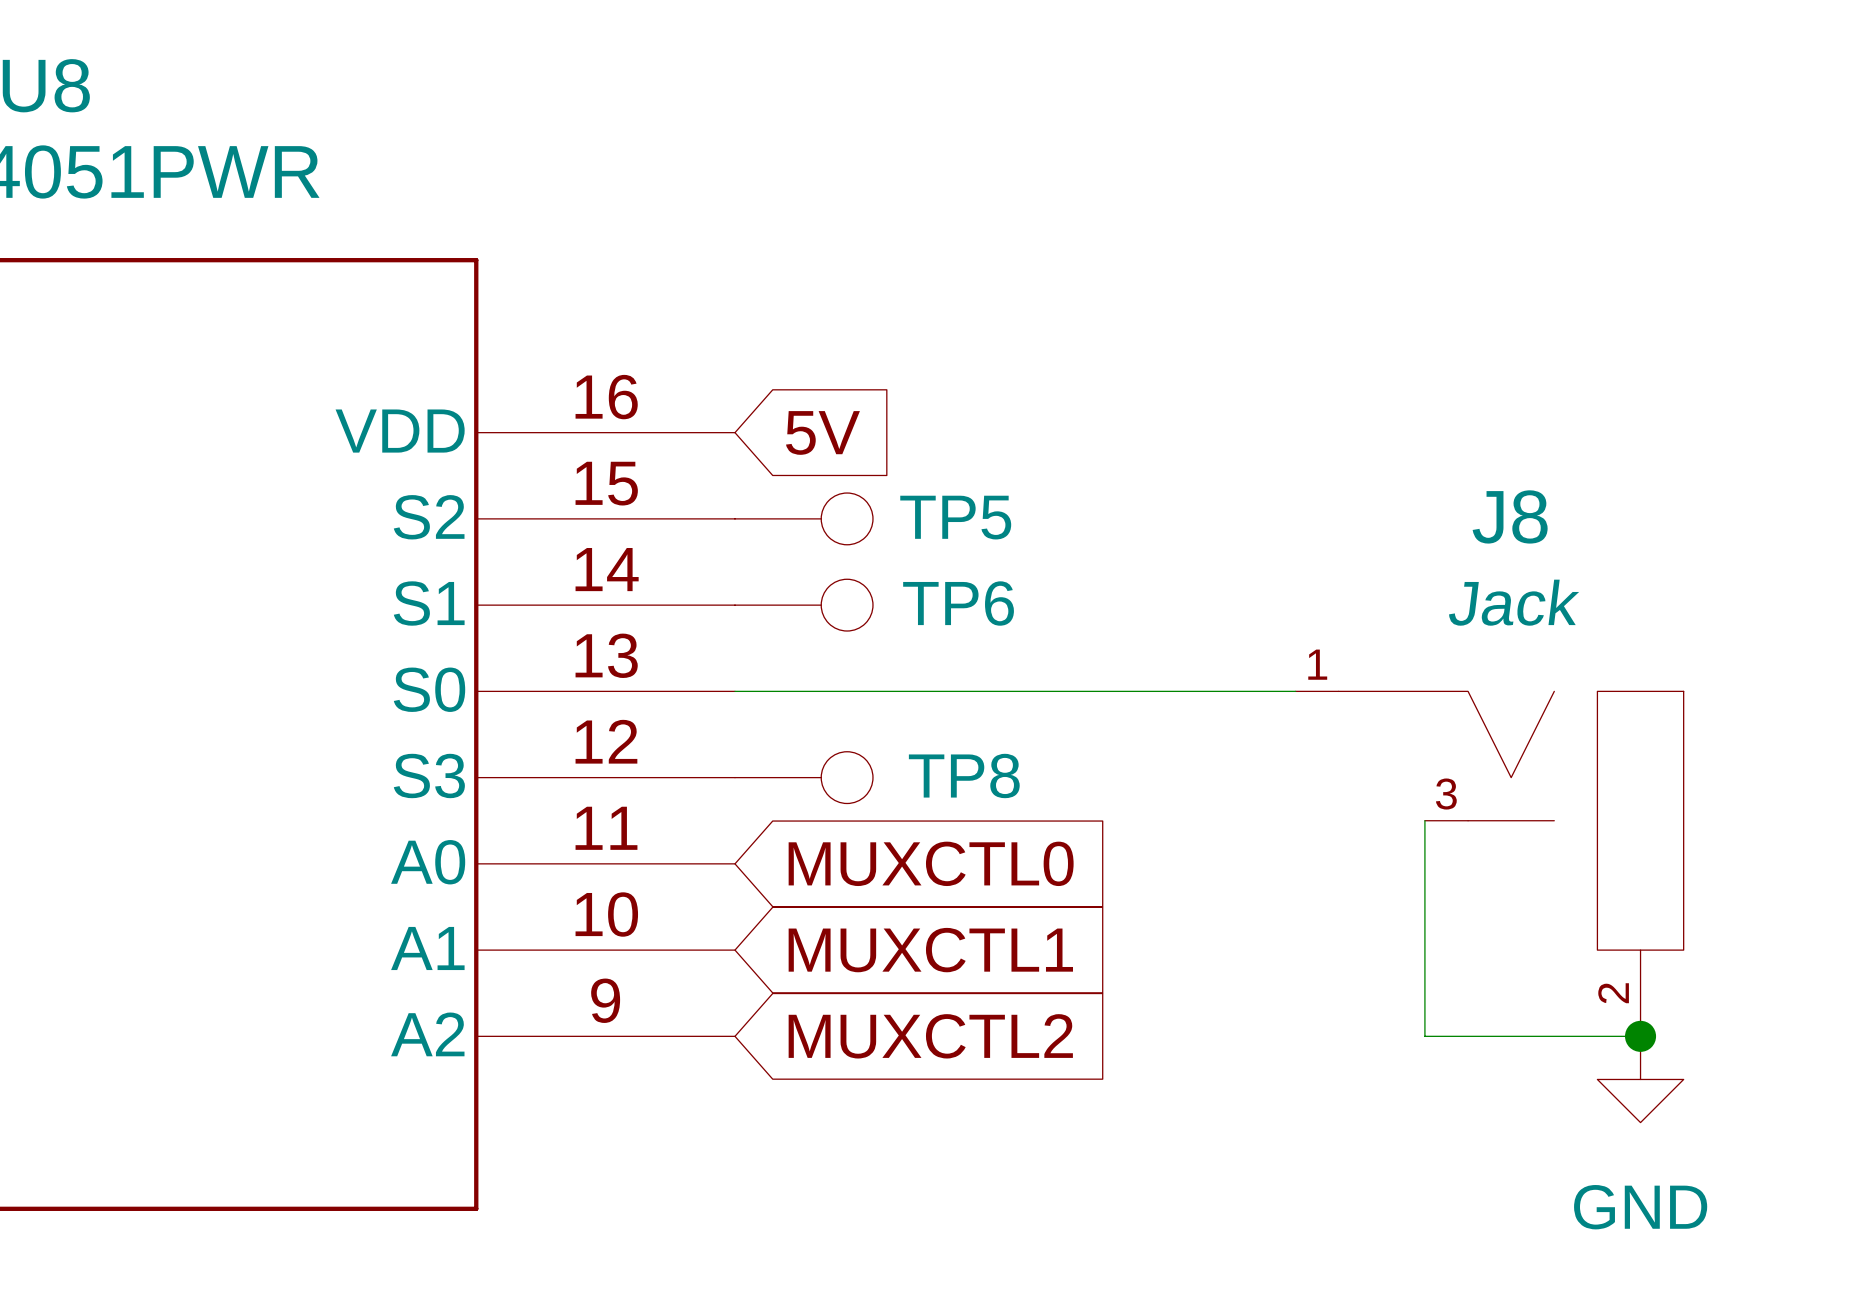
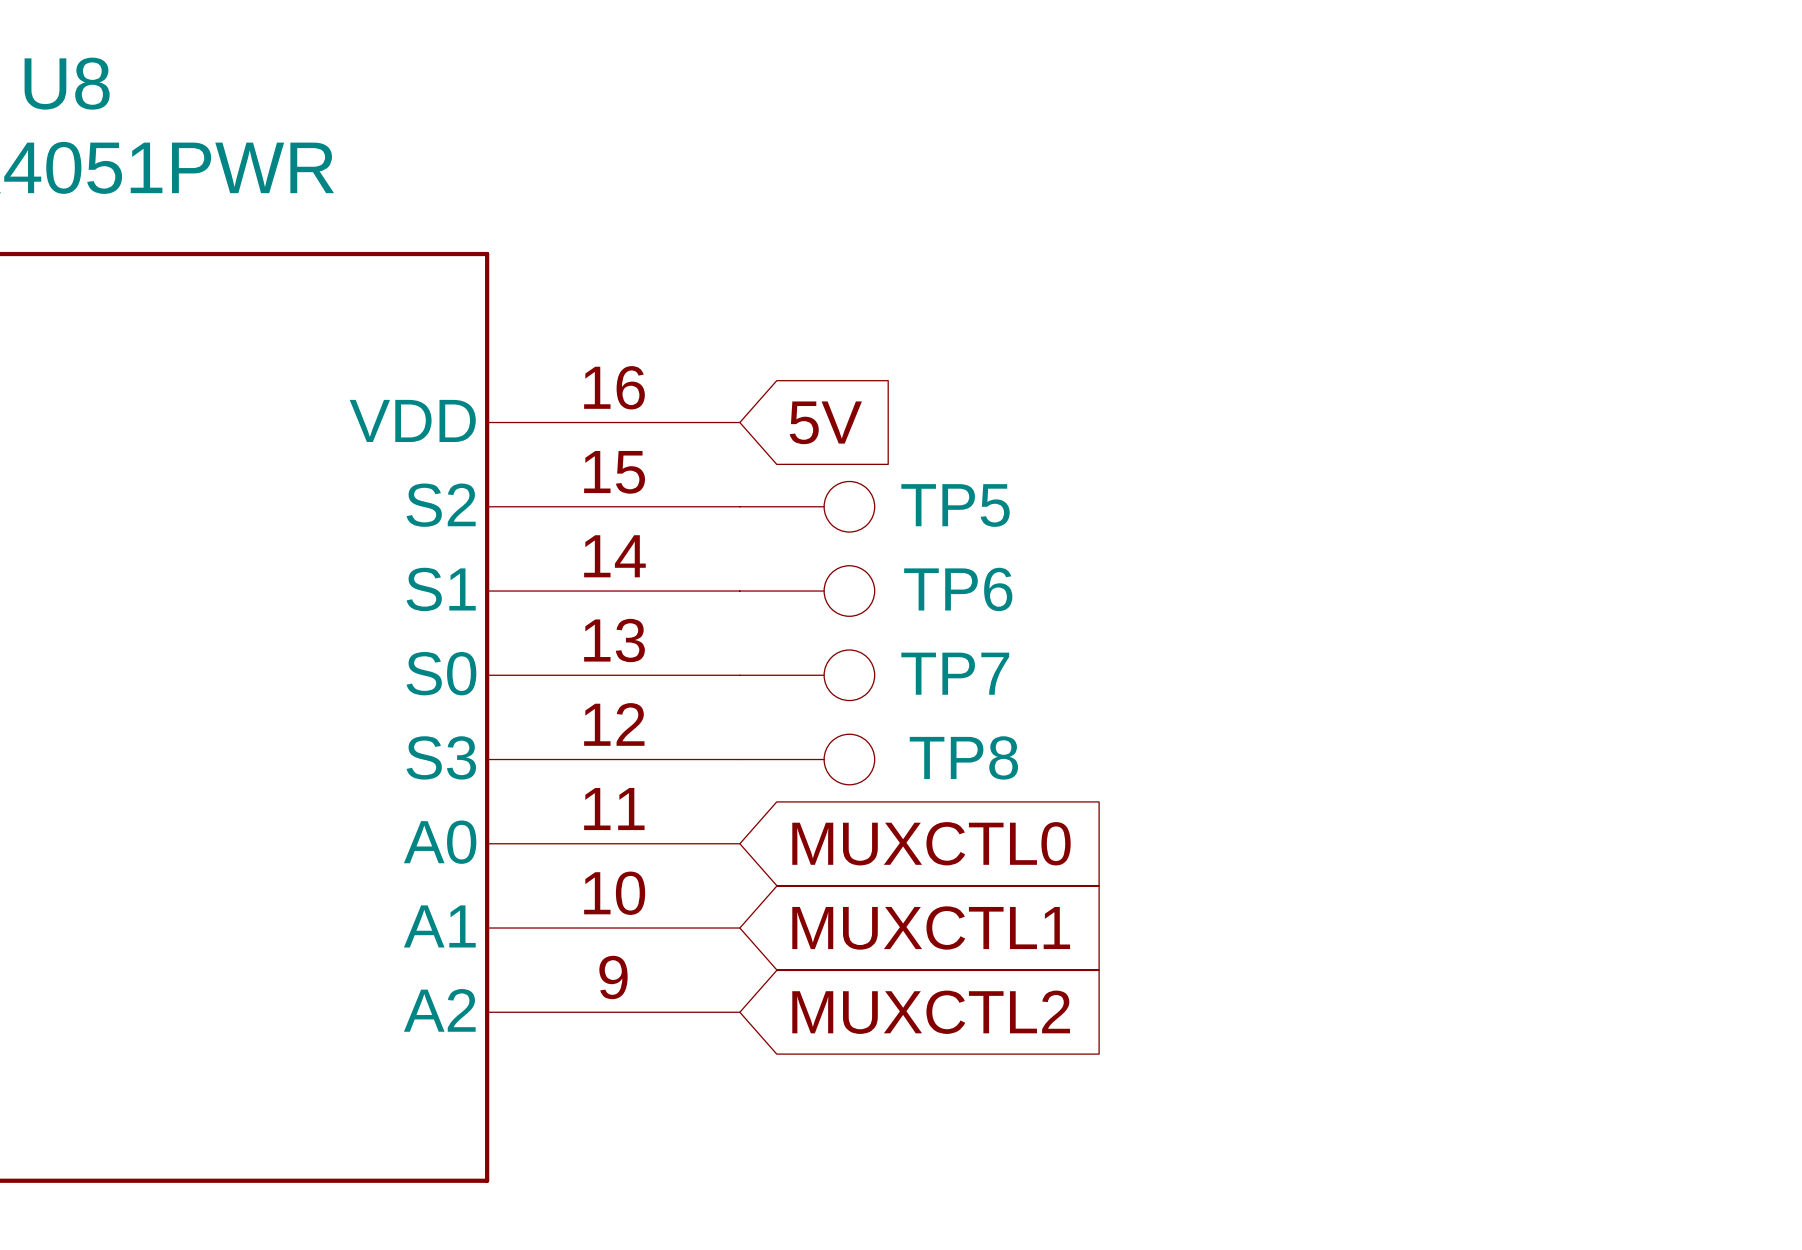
wire: (734, 691) (1295, 691) -> none
TP7: none -> (807, 675)
wire: (1424, 820) (1424, 1036) (1640, 1036) -> none
J8: (1489, 863) -> none
junction: (1640, 1036) -> none
power symbol: GND (1640, 1079) -> none

